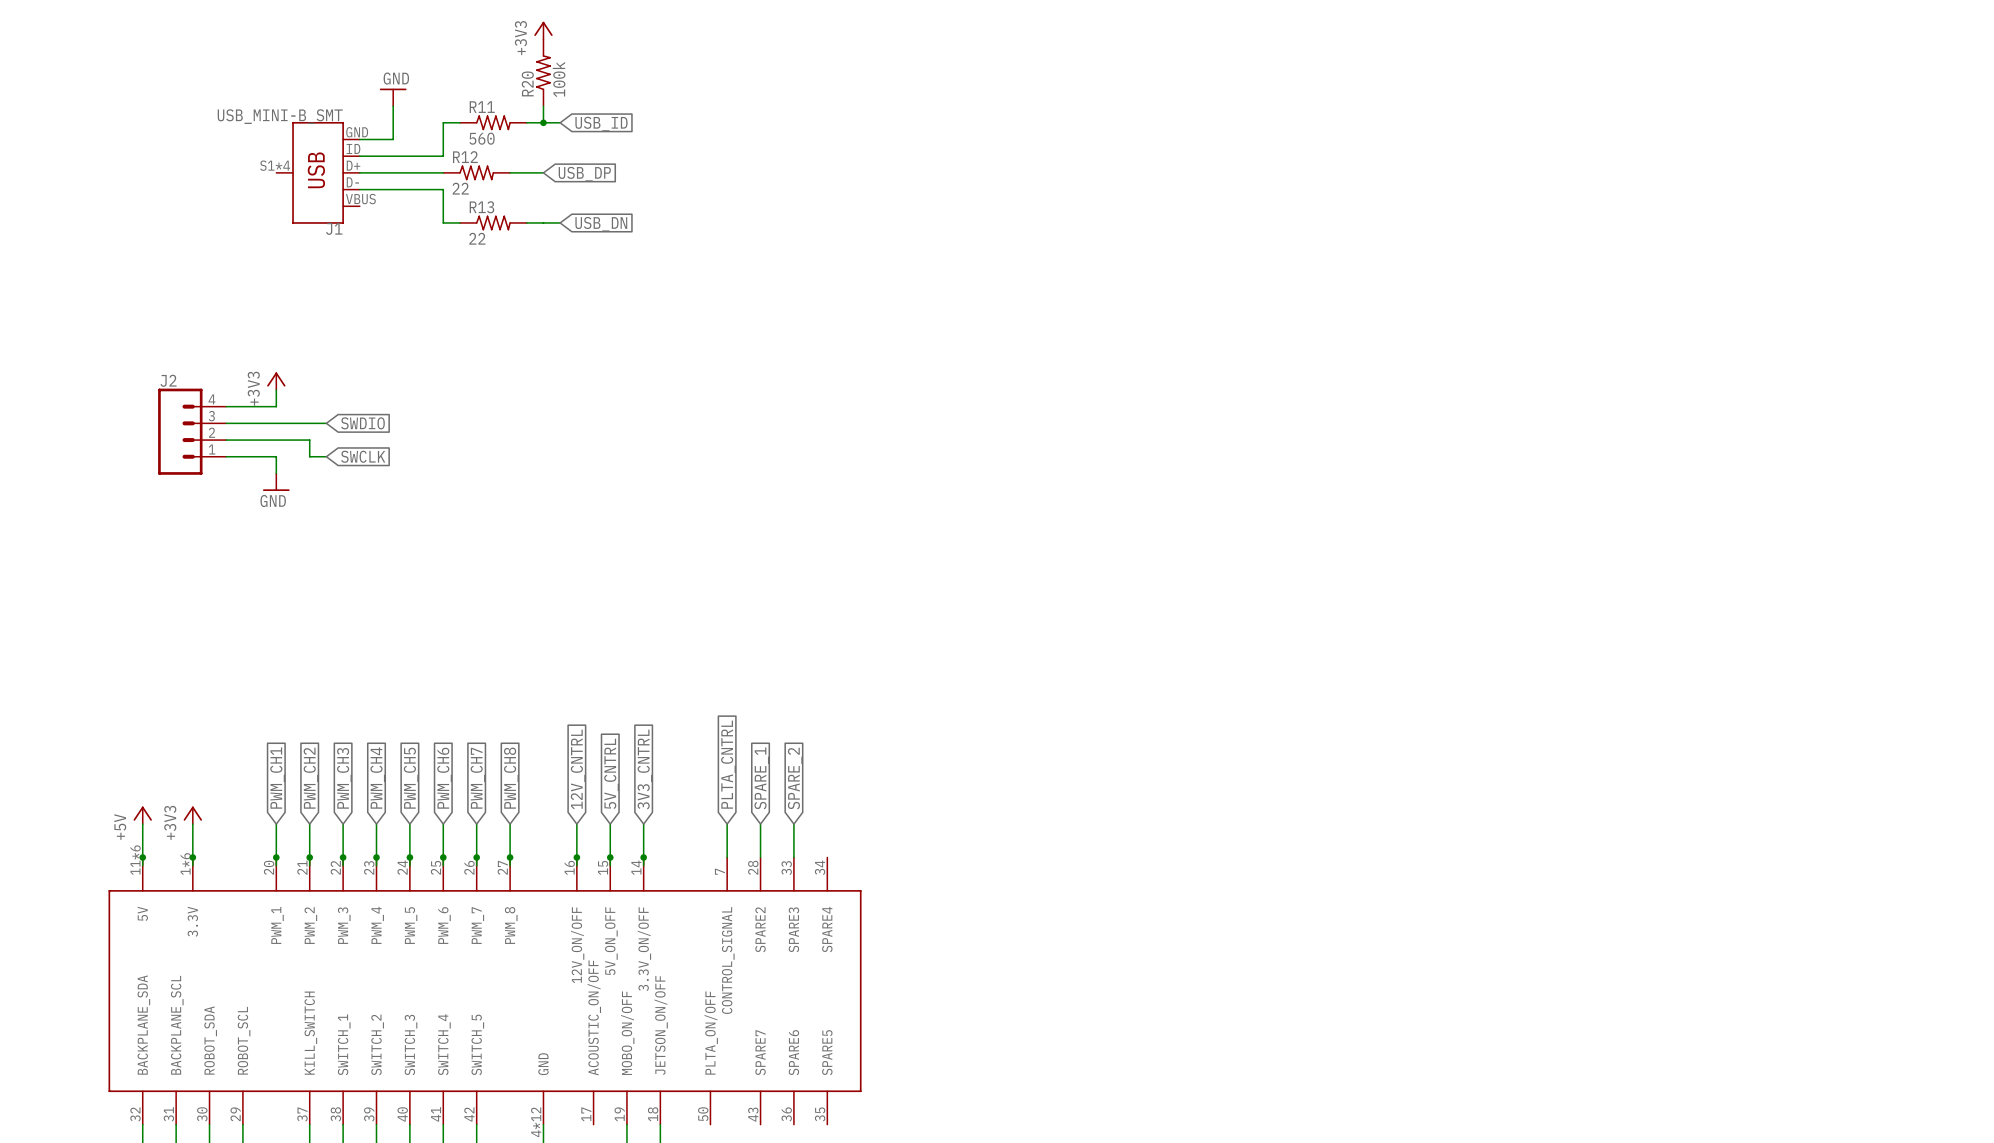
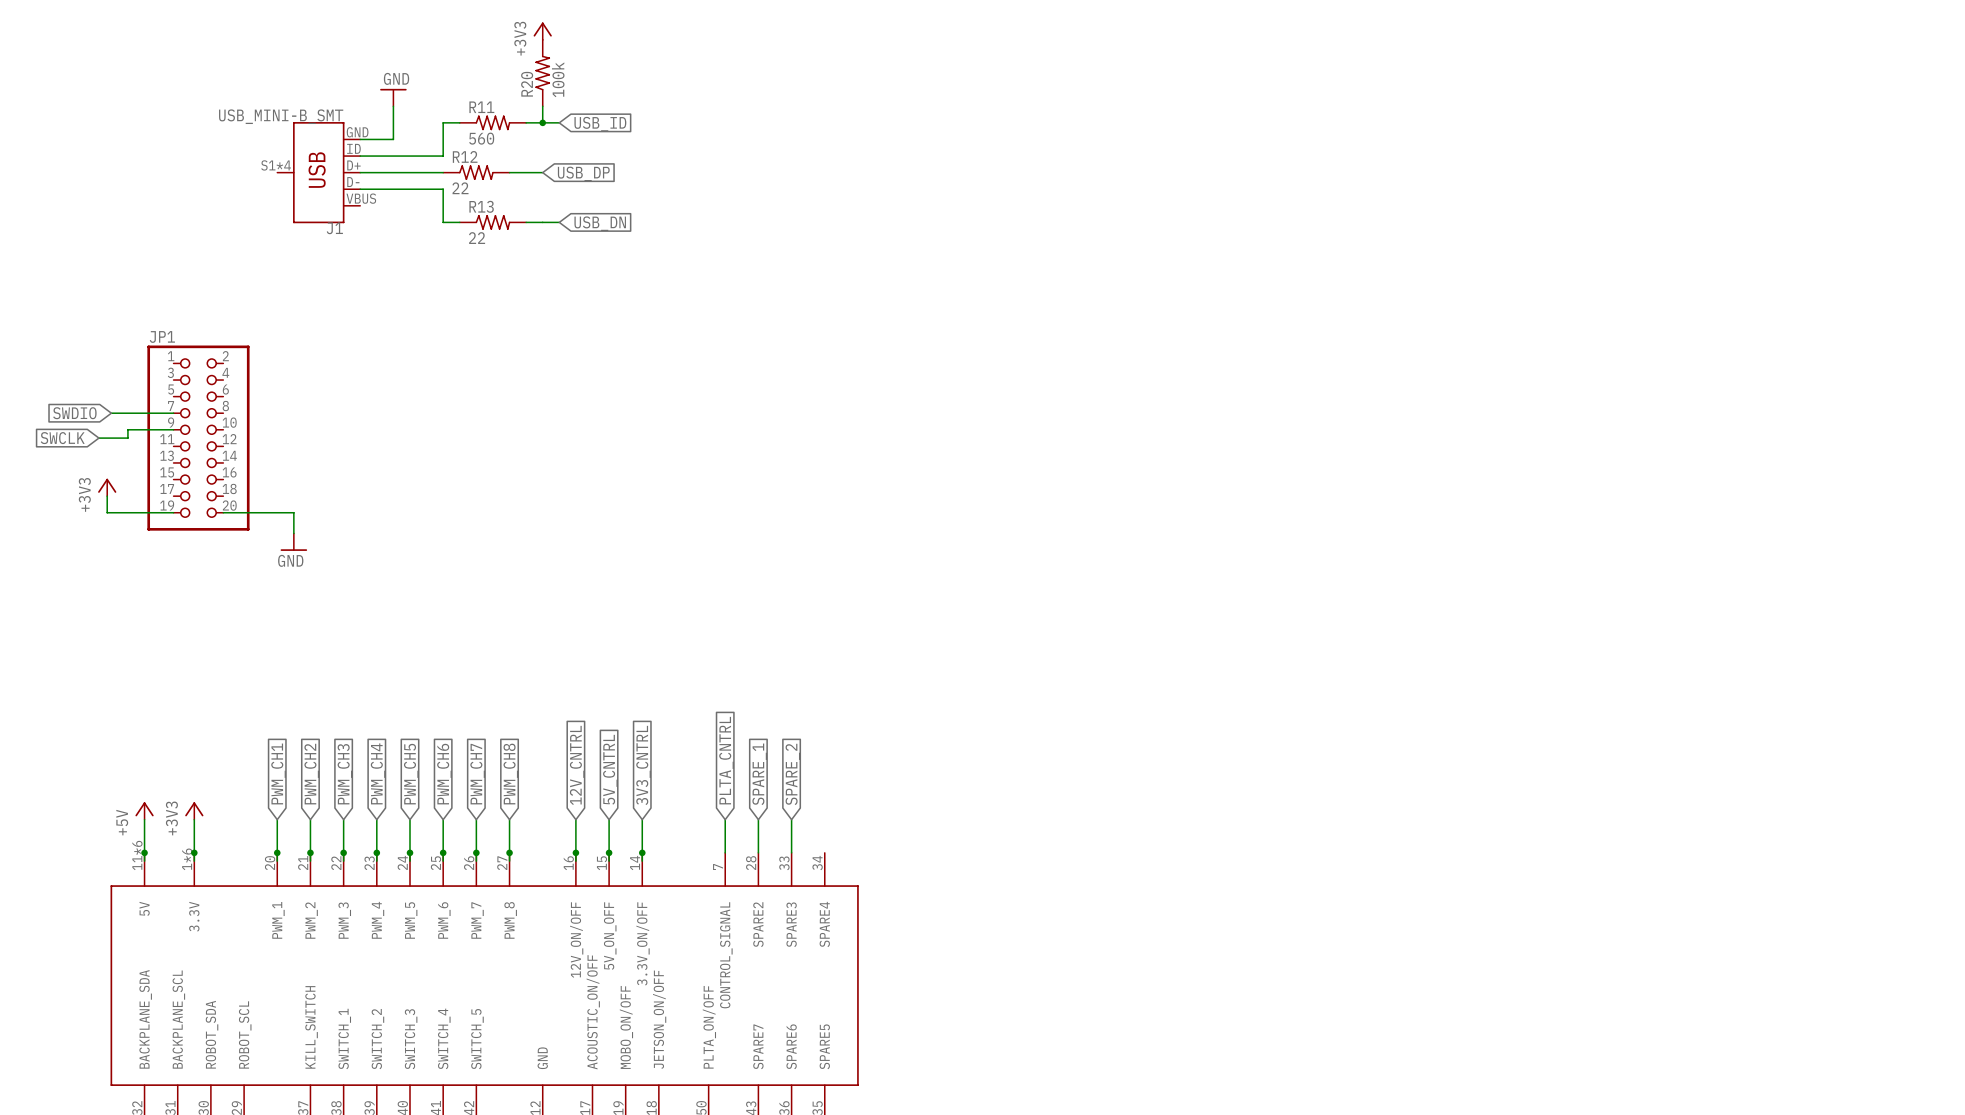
power symbol: +3V3 (276, 381) -> none
wire: (276, 389) (276, 406) (226, 406) -> none
global label: none -> SWDIO (74, 413)
wire: none -> (111, 413) (173, 413)
wire: (226, 423) (326, 423) -> none
global label: SWDIO (362, 423) -> none
wire: none -> (173, 429) (127, 429) (127, 438) (98, 438)
J2: (192, 431) -> none
global label: none -> SWCLK (62, 438)
JP1: none -> (198, 438)
wire: (226, 440) (309, 440) (309, 456) (326, 456) -> none
wire: (226, 456) (276, 456) (276, 473) -> none
global label: SWCLK (363, 456) -> none
power symbol position: GND (276, 482) -> GND (293, 542)
power symbol: none -> +3V3 (107, 487)
wire: none -> (107, 496) (107, 512) (173, 512)
wire: none -> (223, 512) (293, 512) (293, 533)

